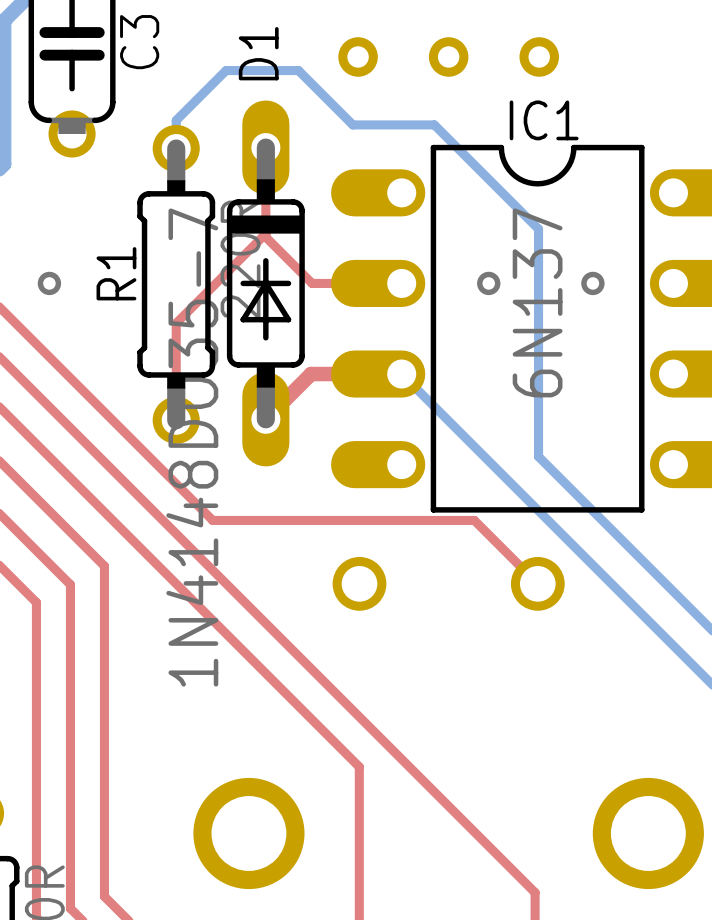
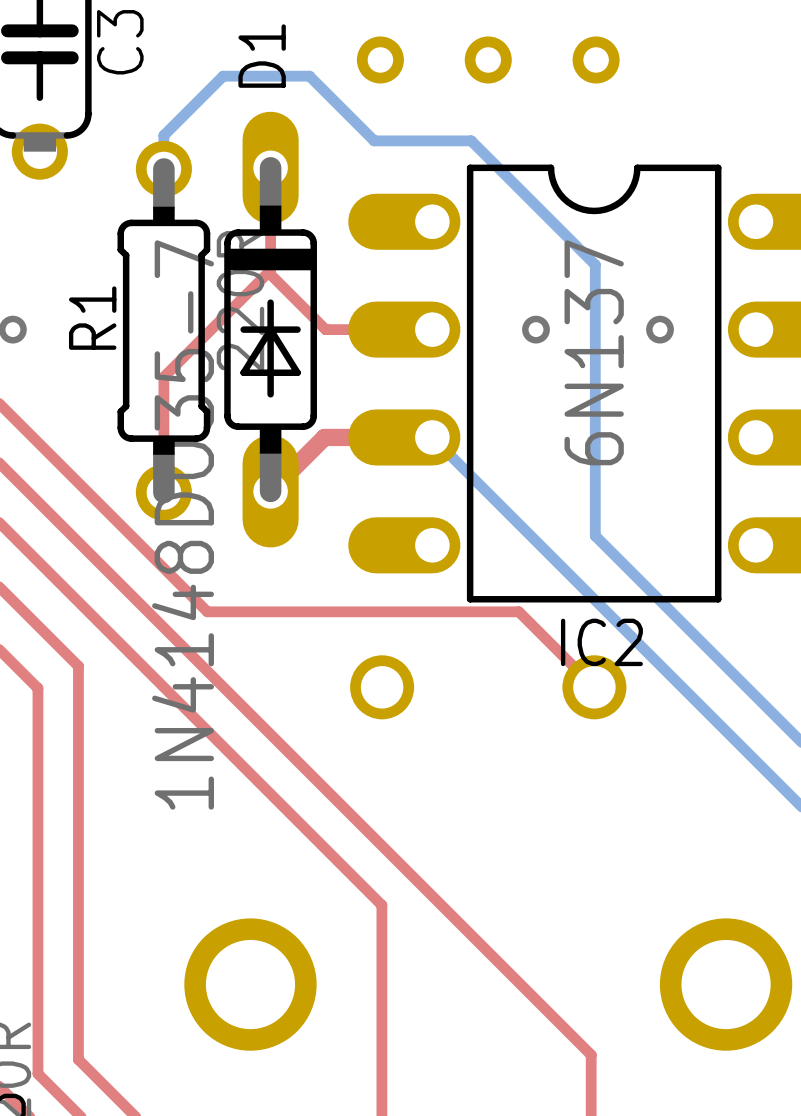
IC1 name: IC1 (544, 120) -> IC2 (601, 642)

